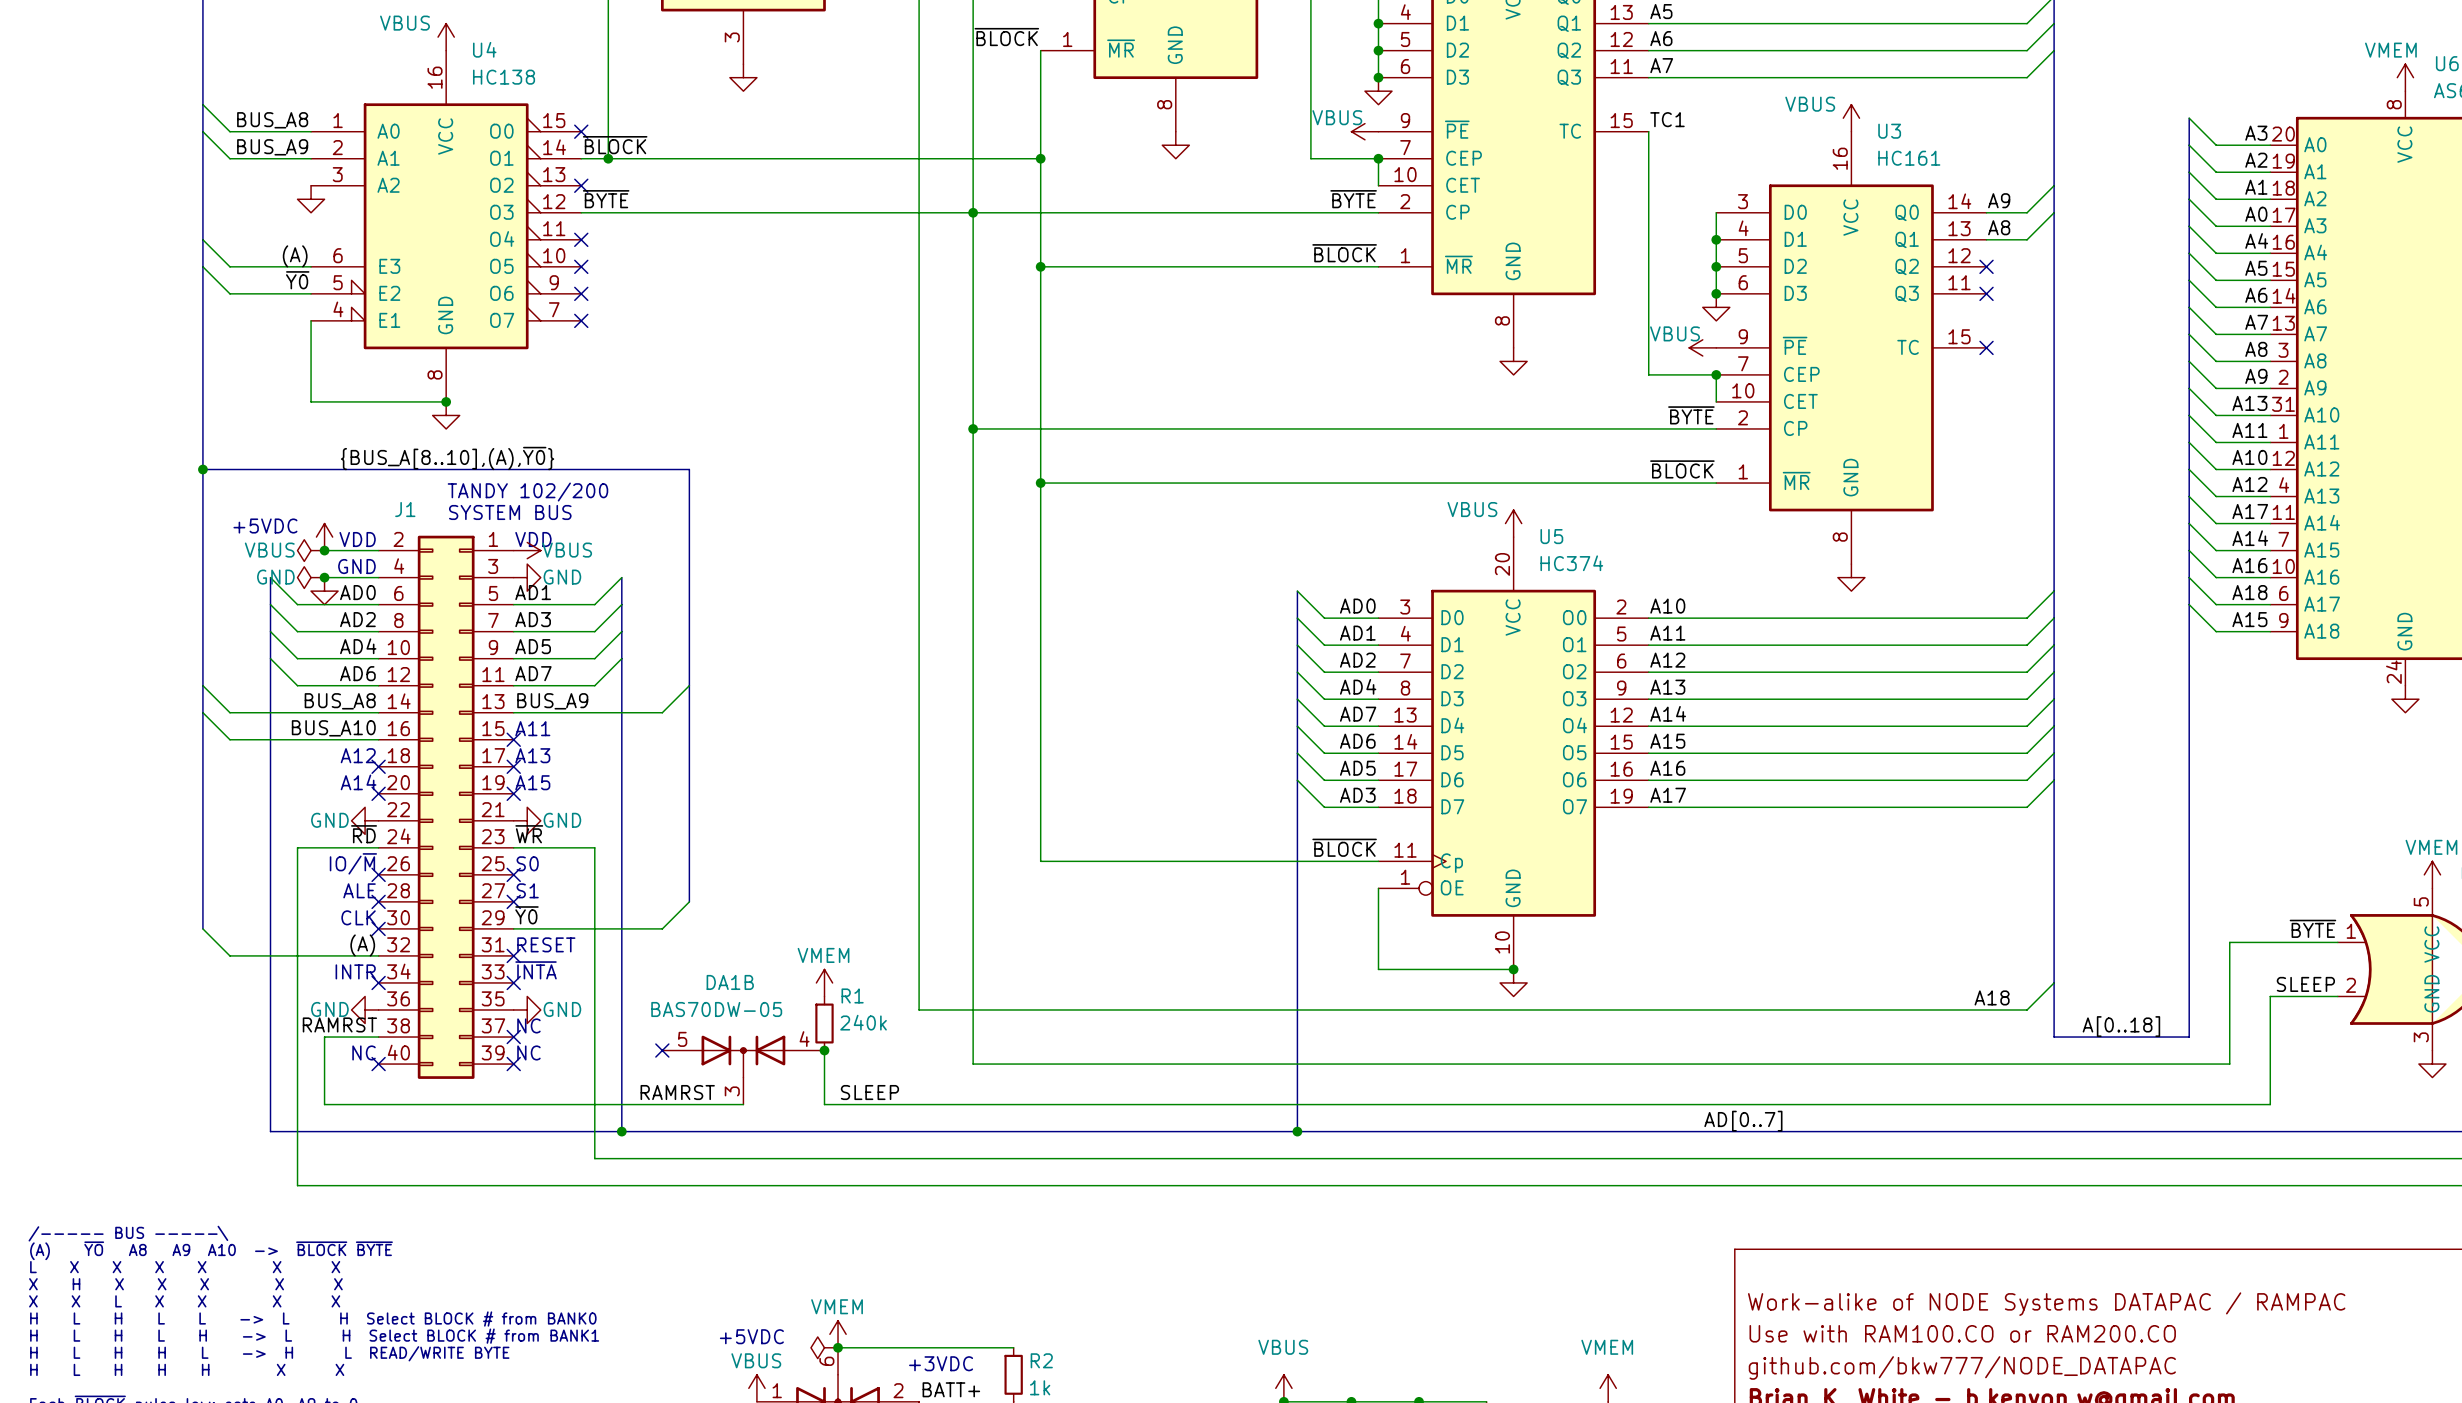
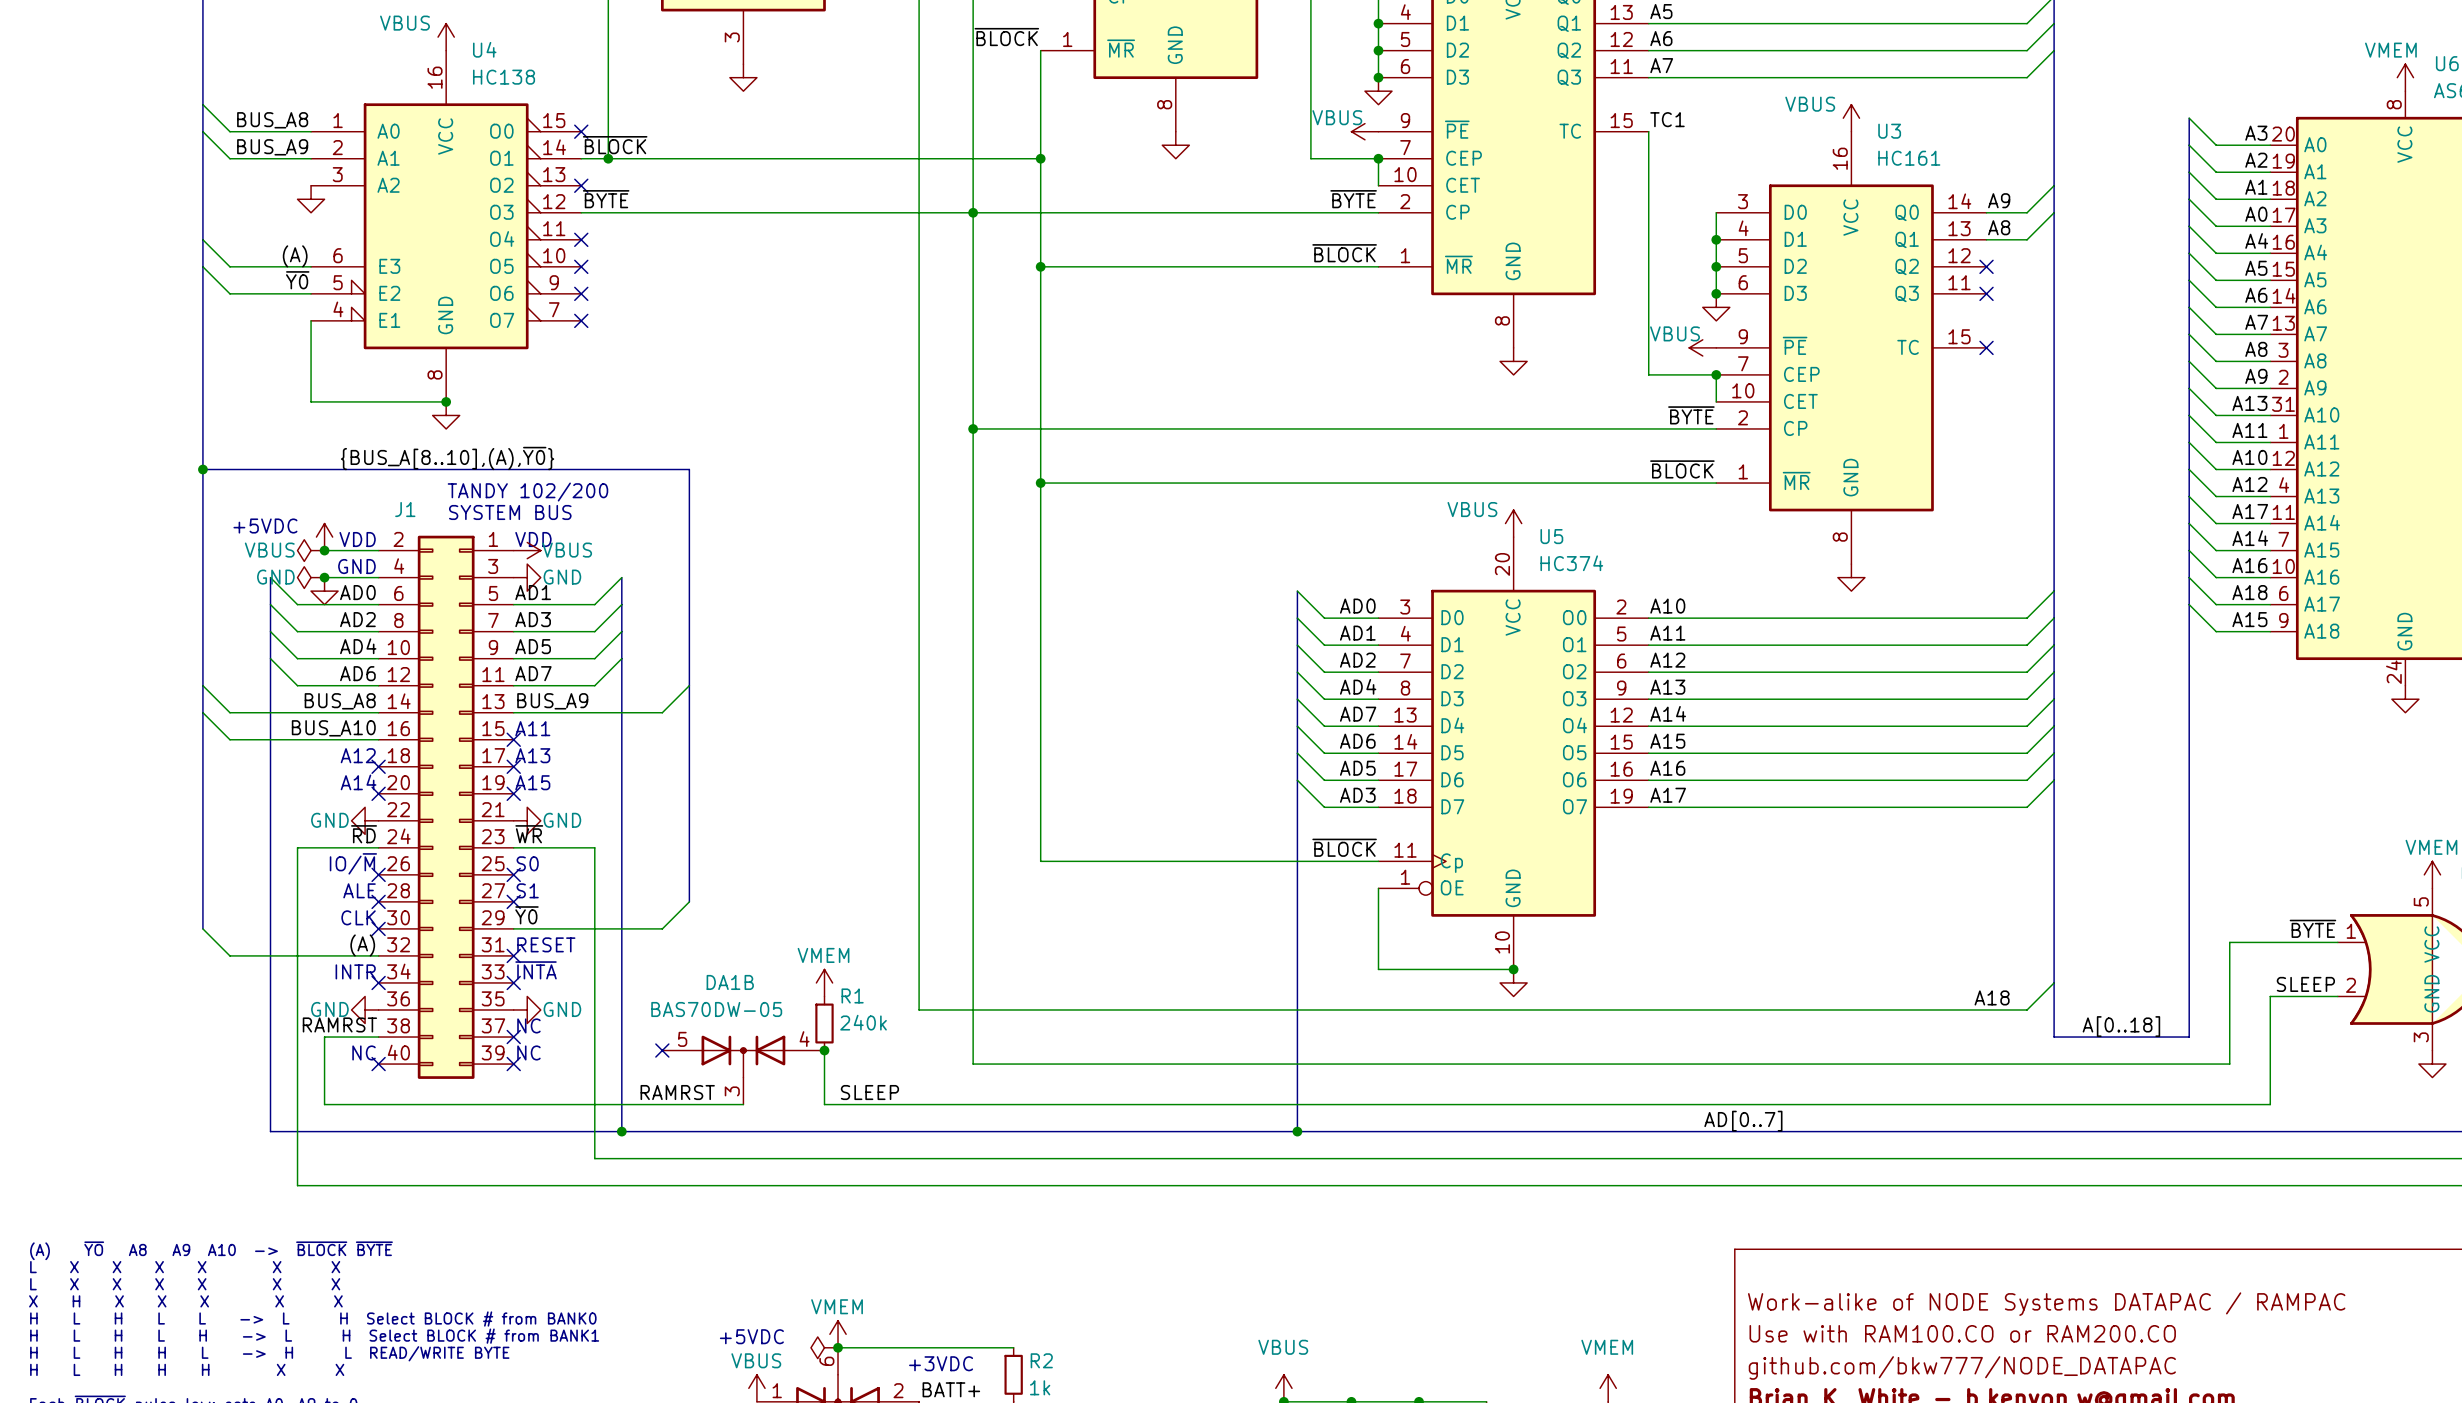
text: /----- BUS -----\ (128, 1233) -> none
text: X H X X X X X (185, 1284) -> L X X X X X X (185, 1284)
text: X X L X X X X (184, 1301) -> X H X X X X X (185, 1301)

